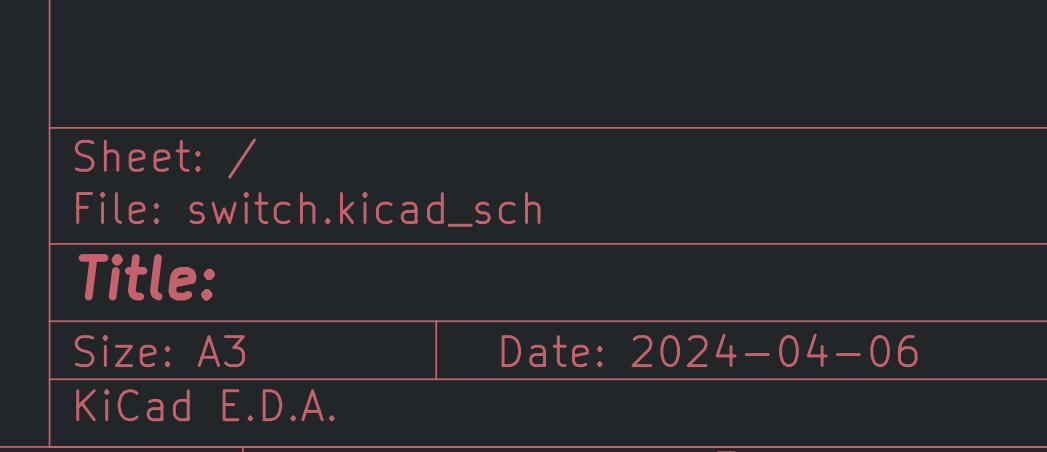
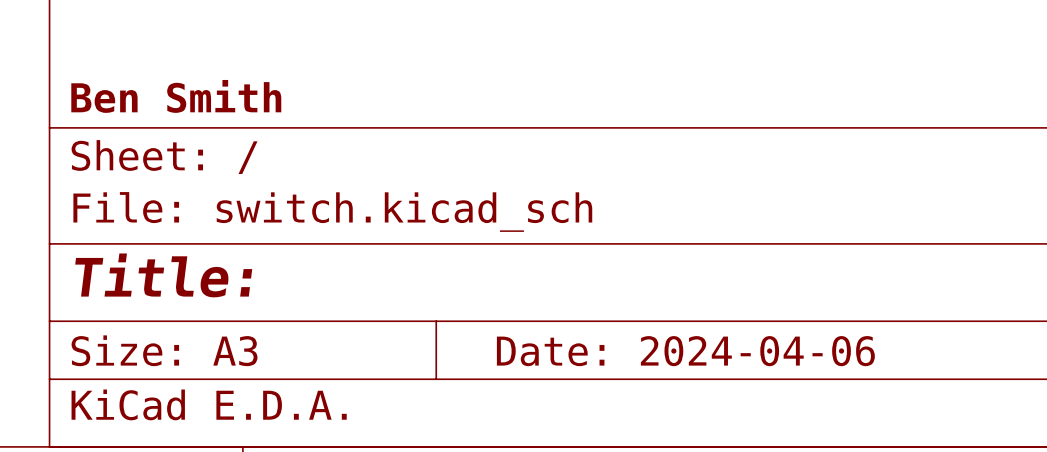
title block: none -> Ben Smith (176, 96)

